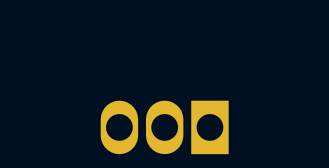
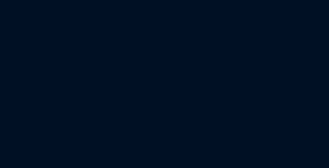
part: (164, 127) -> none

